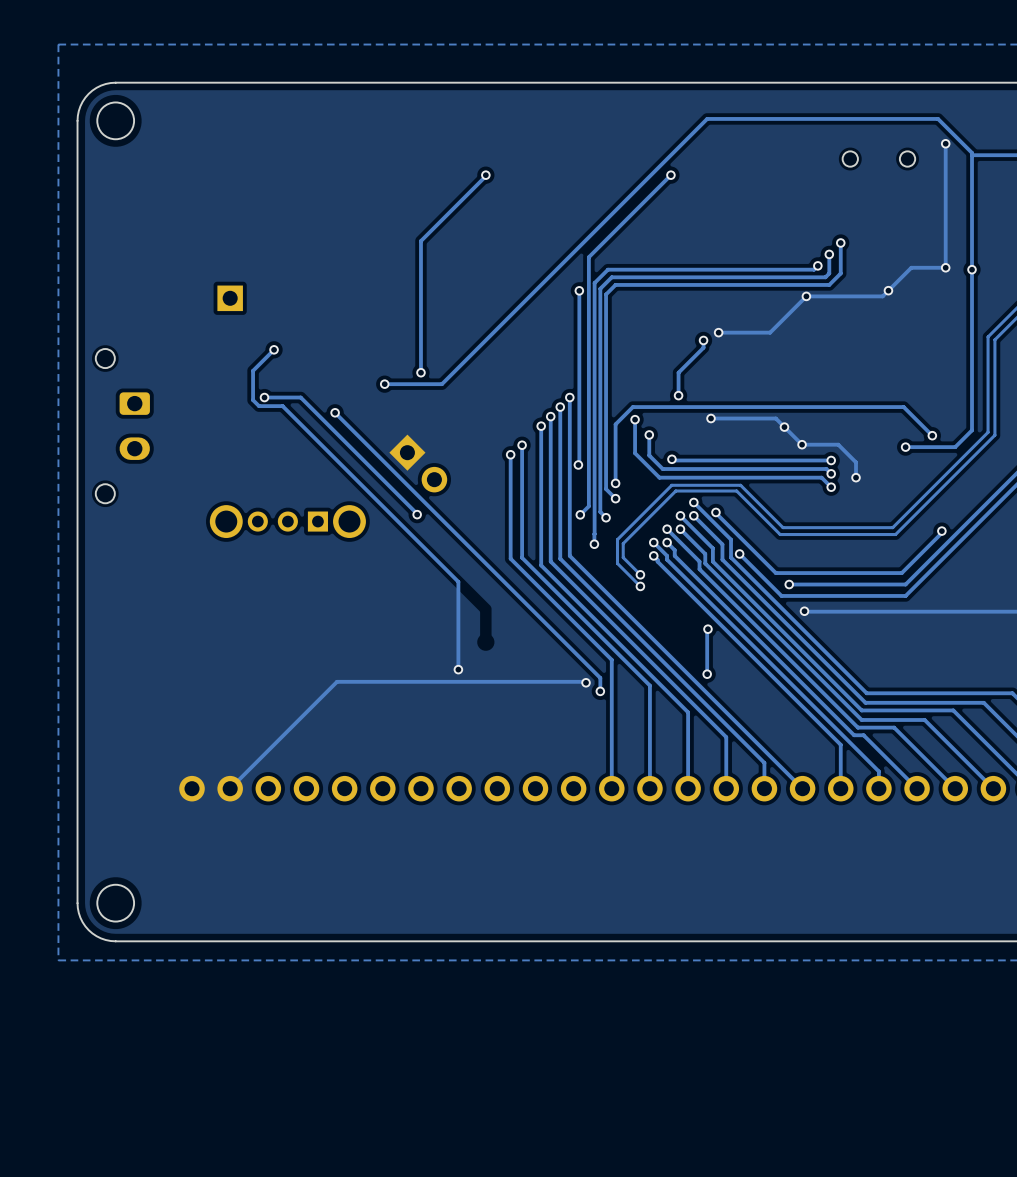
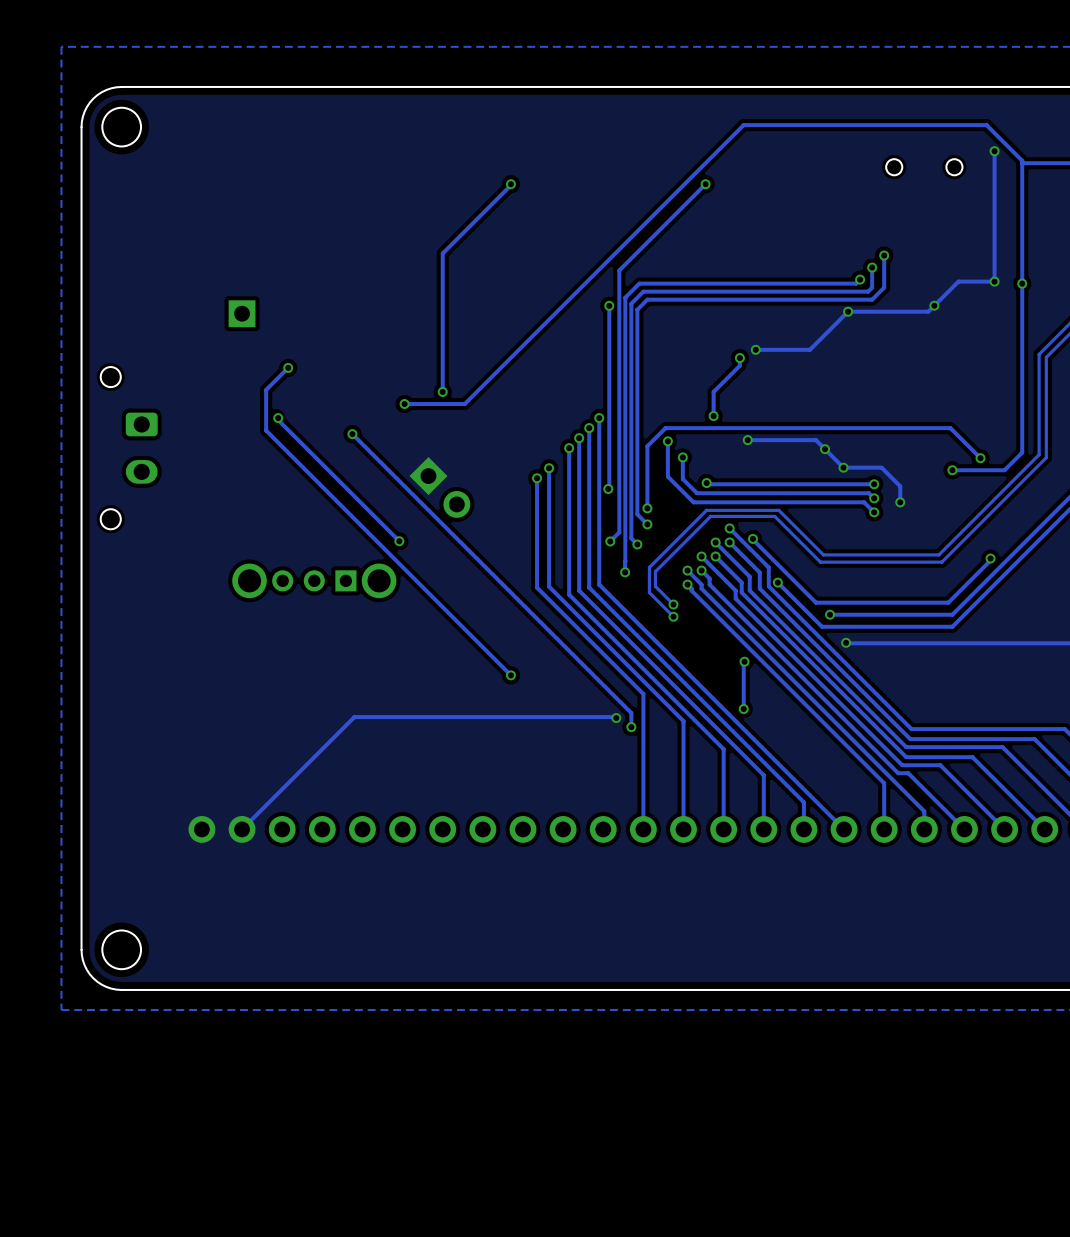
track: none -> (276, 418) (399, 541)
track: (264, 397) (300, 397) (417, 514) -> none
track: (253, 400) (259, 406) (282, 406) (458, 581) (458, 669) -> (266, 420) (266, 430) (510, 675)
via position: (417, 514) -> (399, 541)
part position: (287, 521) -> (314, 580)
via position: (458, 669) -> (510, 675)

